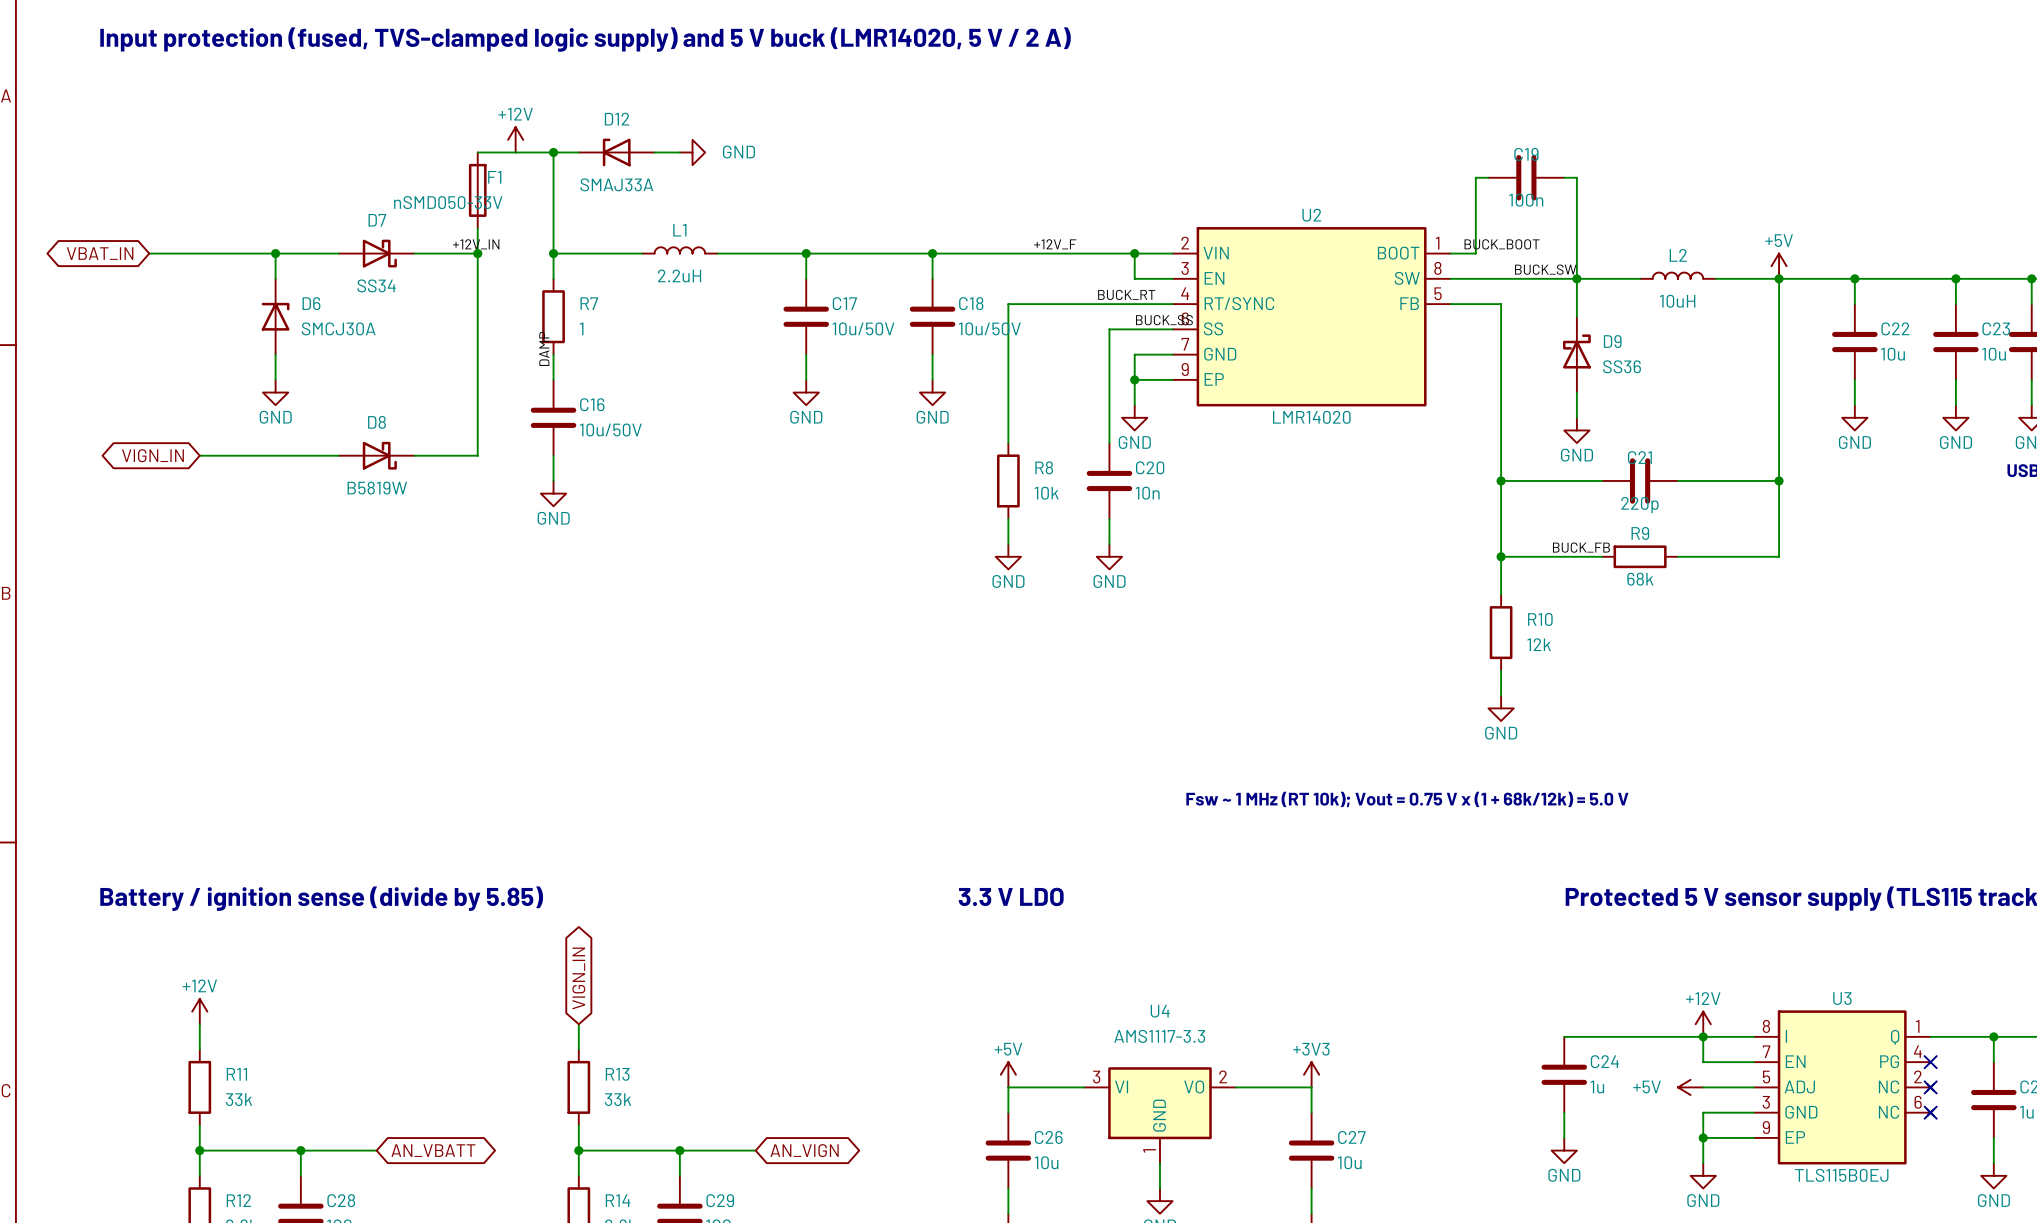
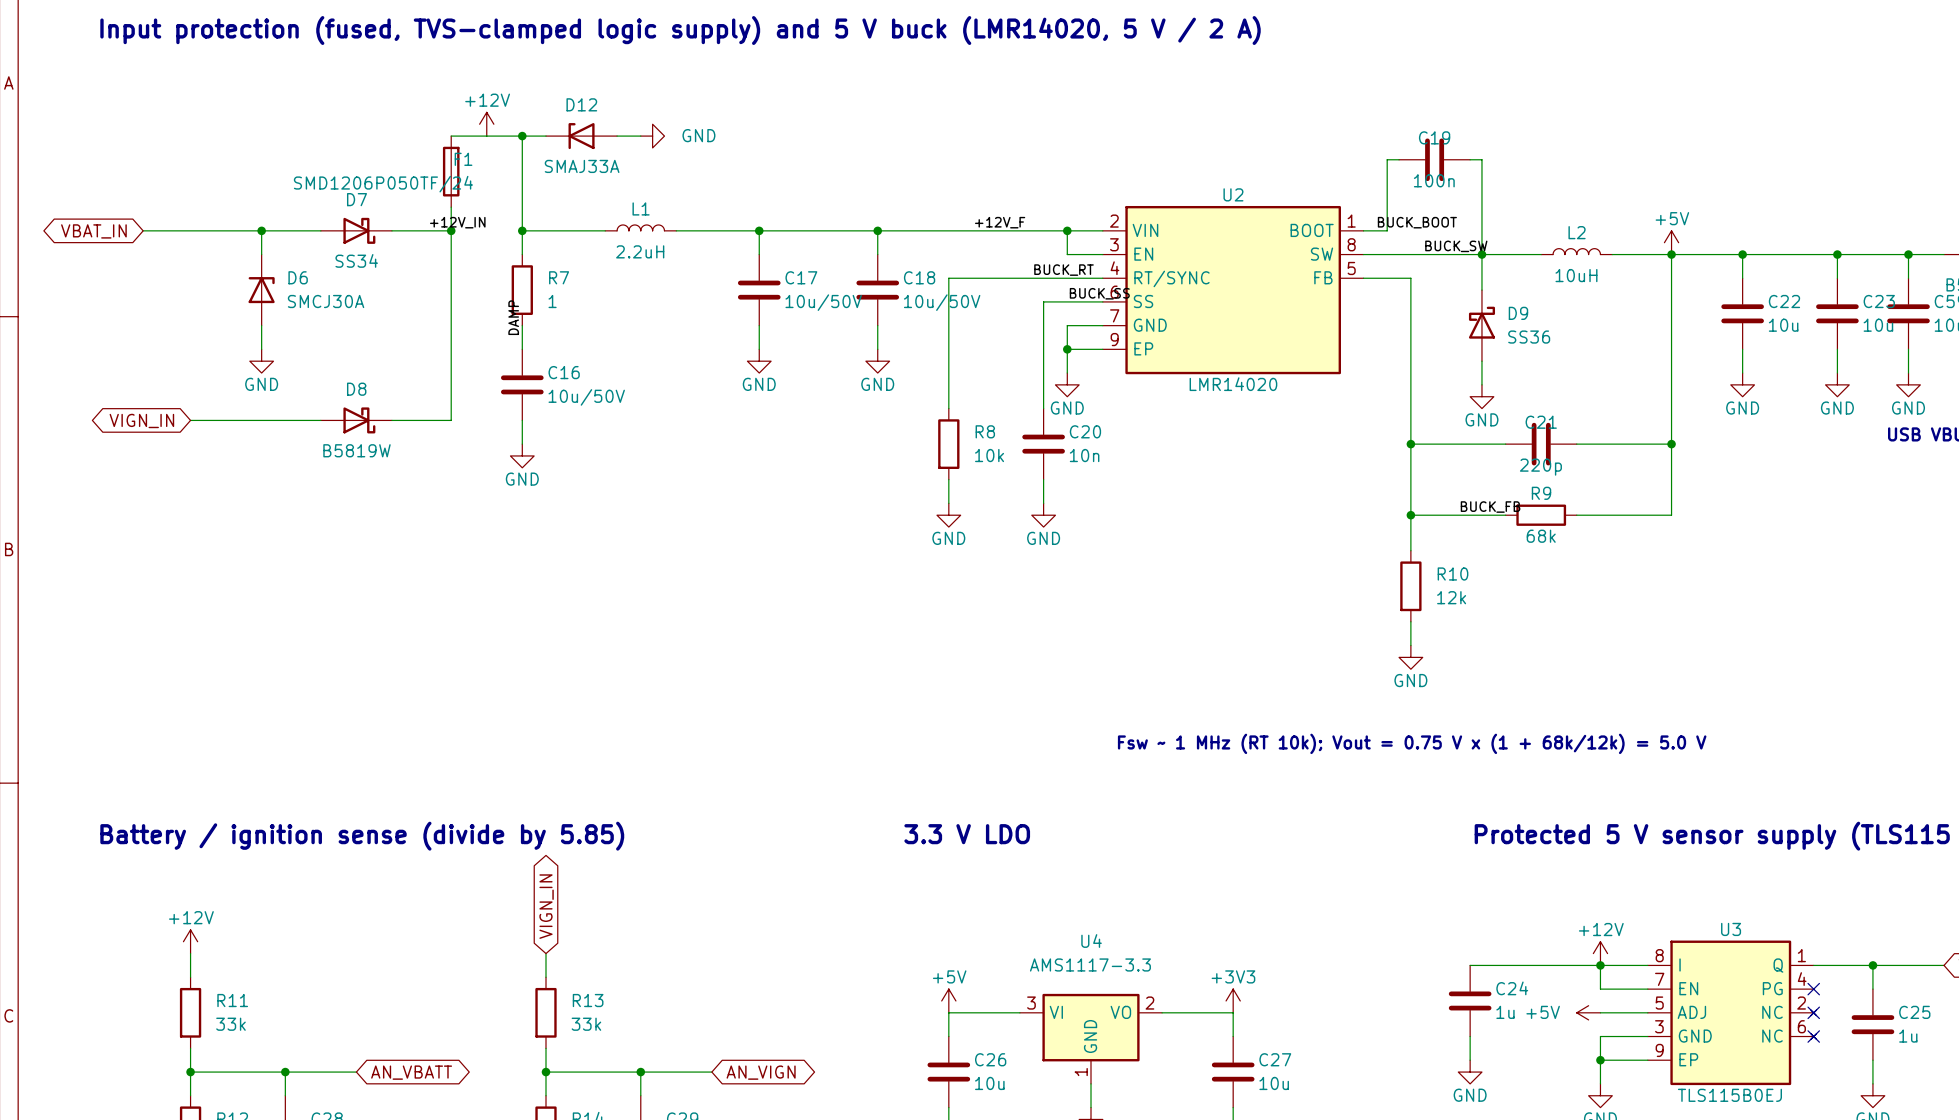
F1 value: nSMD050-33V (448, 202) -> SMD1206P050TF/24 (383, 184)

